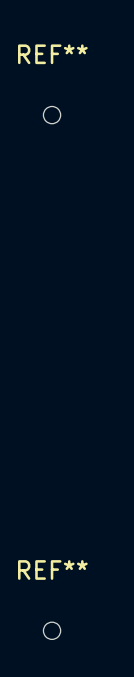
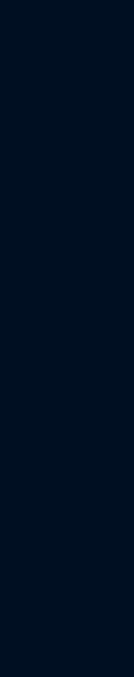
REF**: (52, 115) -> none
REF**: (52, 630) -> none

